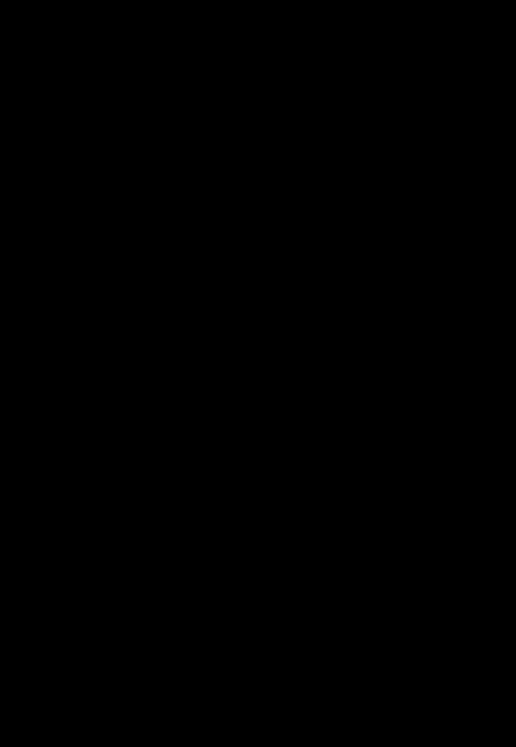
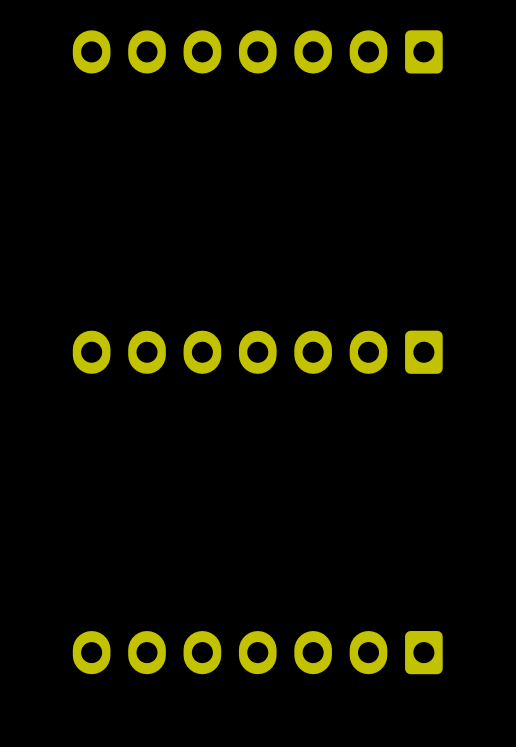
part: none -> (257, 51)
part: none -> (257, 352)
part: none -> (257, 652)

